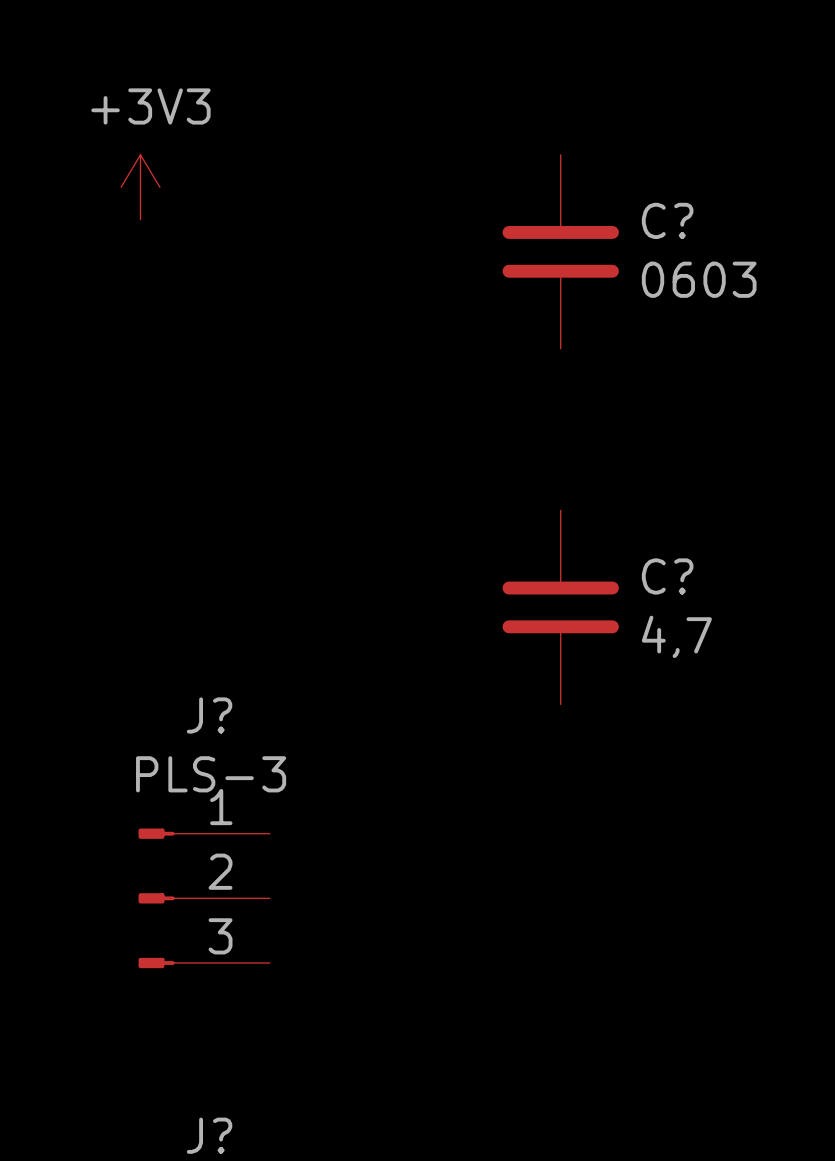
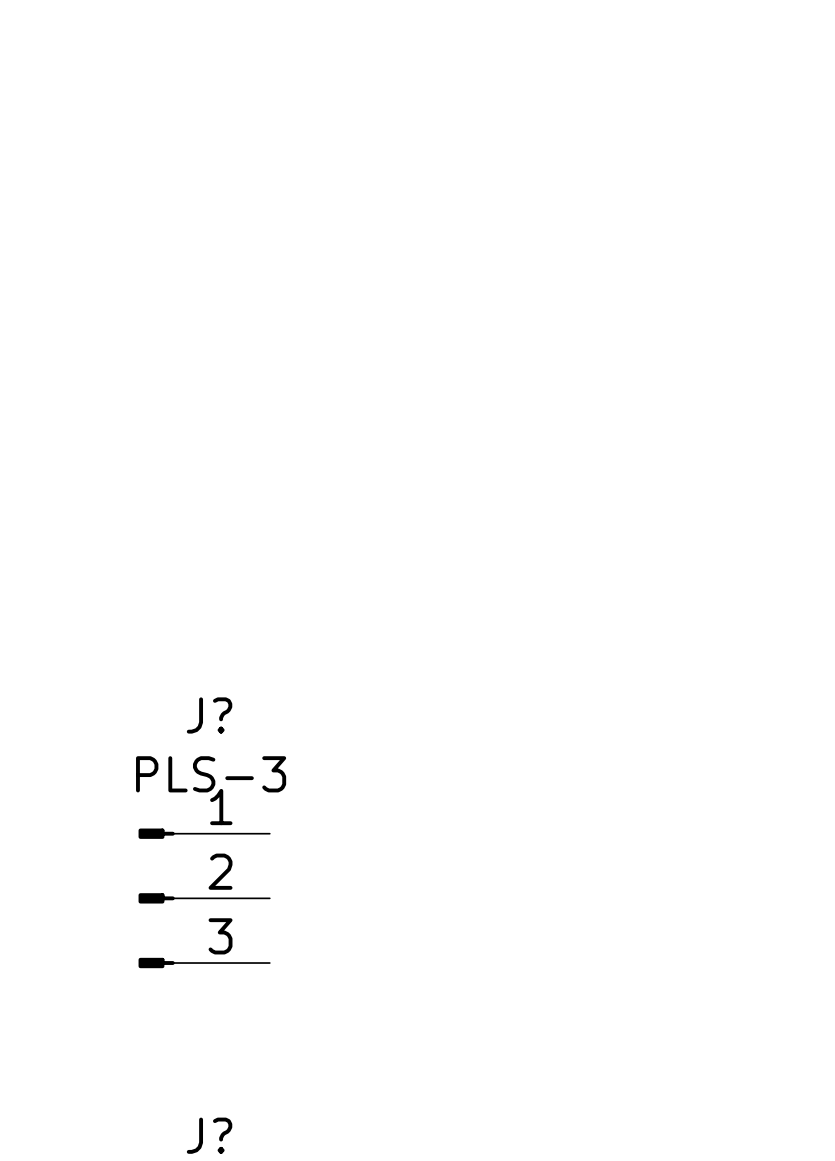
power symbol: +3V3 (140, 187) -> none
C?: 0603 (560, 251) -> none
C?: 4,7 (560, 607) -> none

